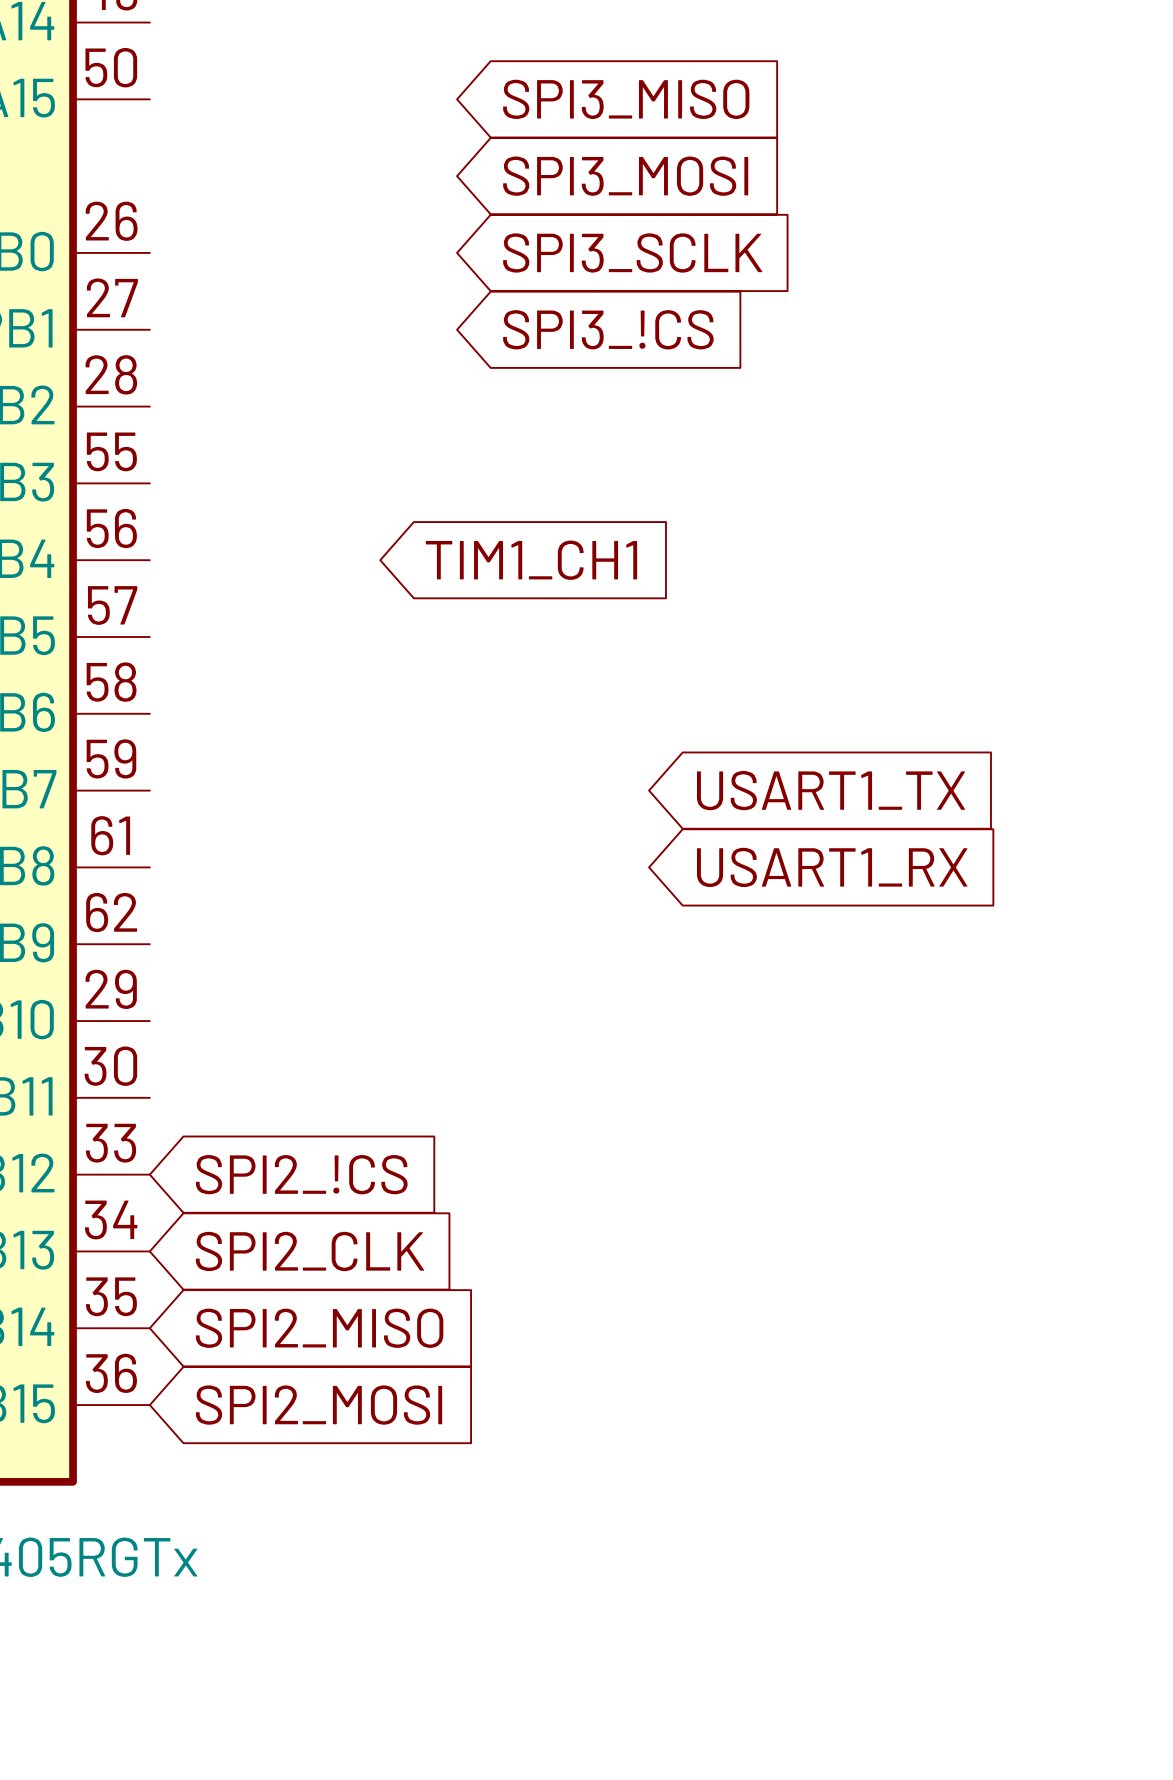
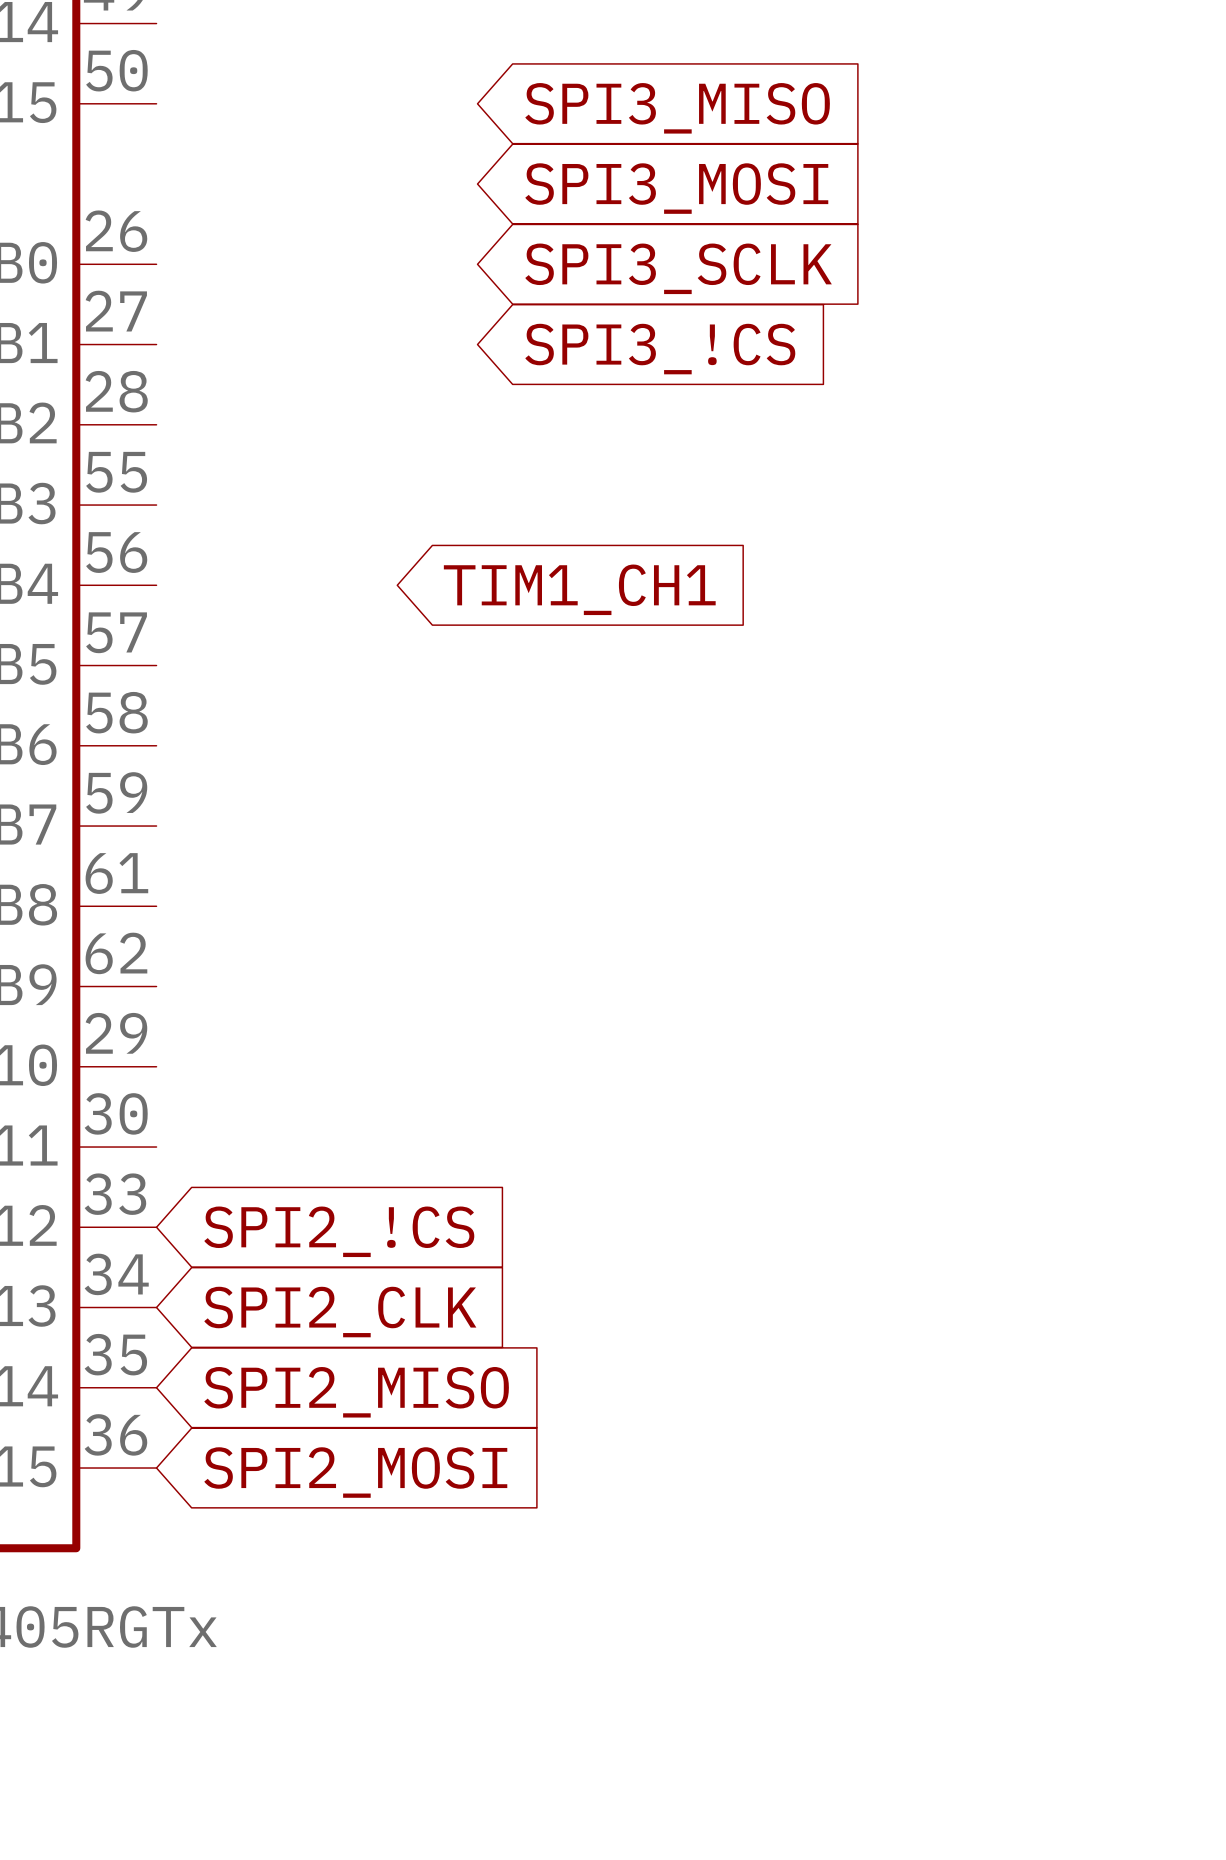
global label: USART1_TX (831, 790) -> none
global label: USART1_RX (832, 867) -> none

